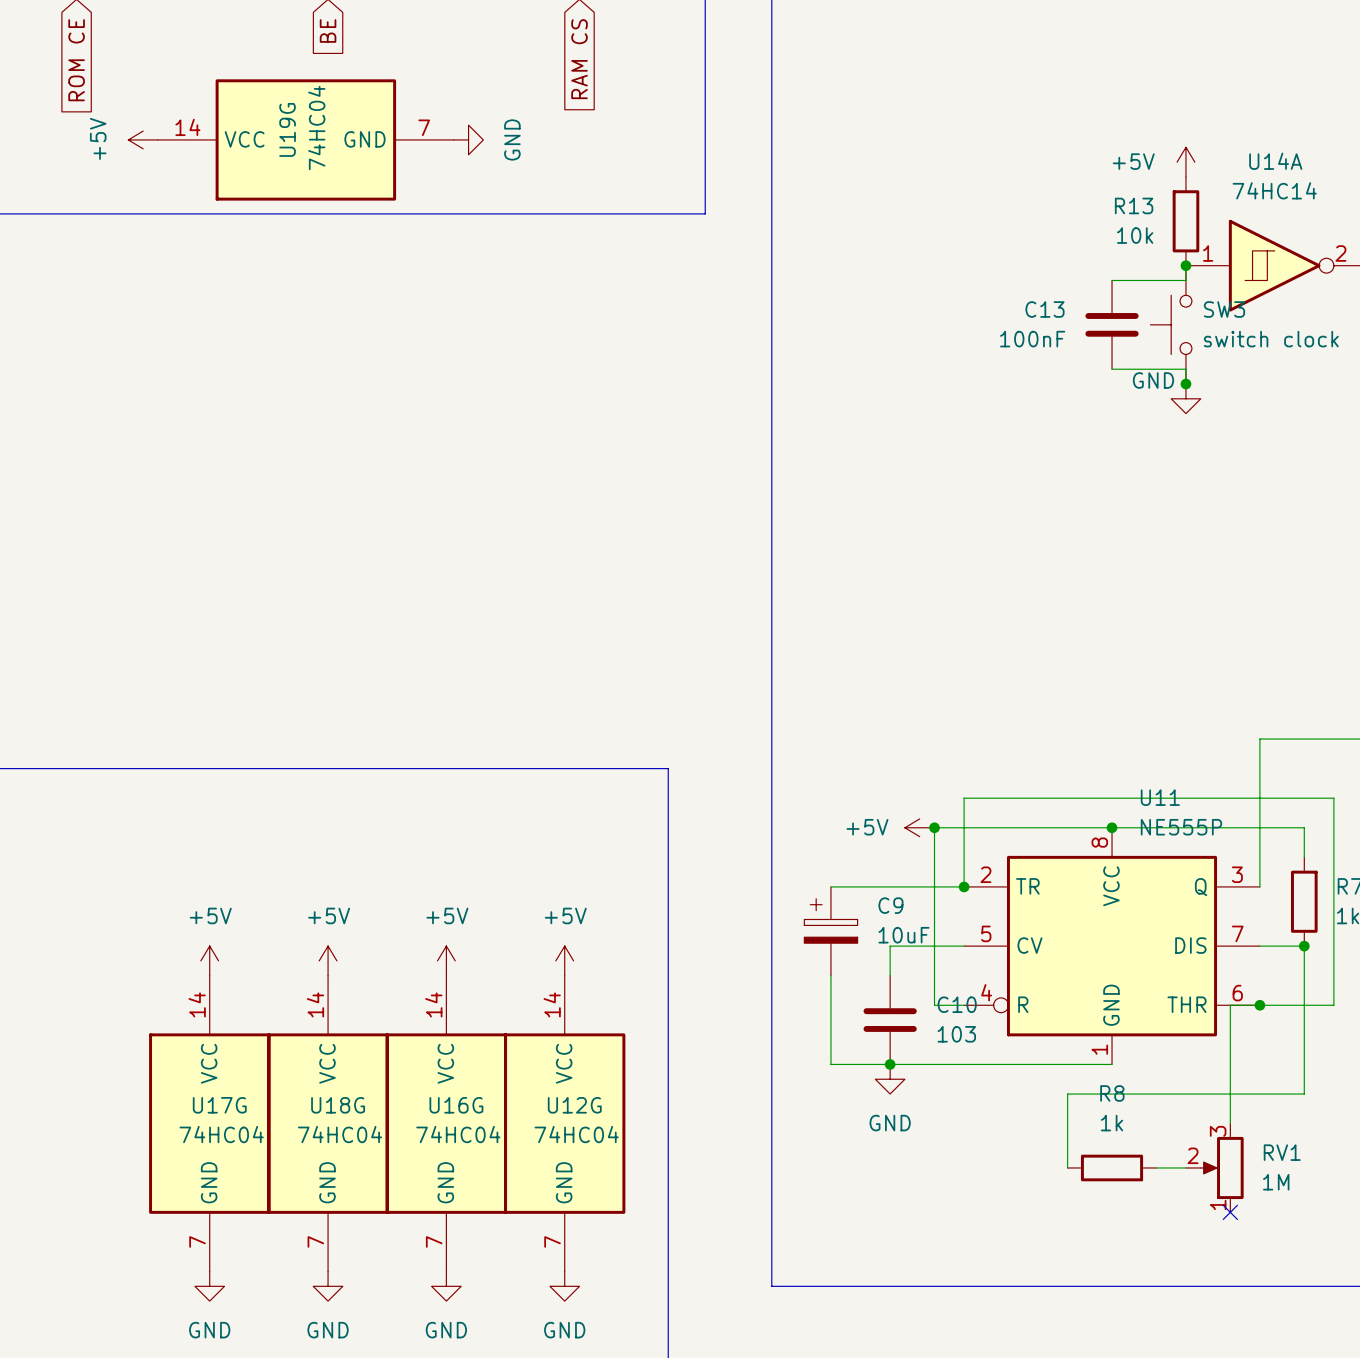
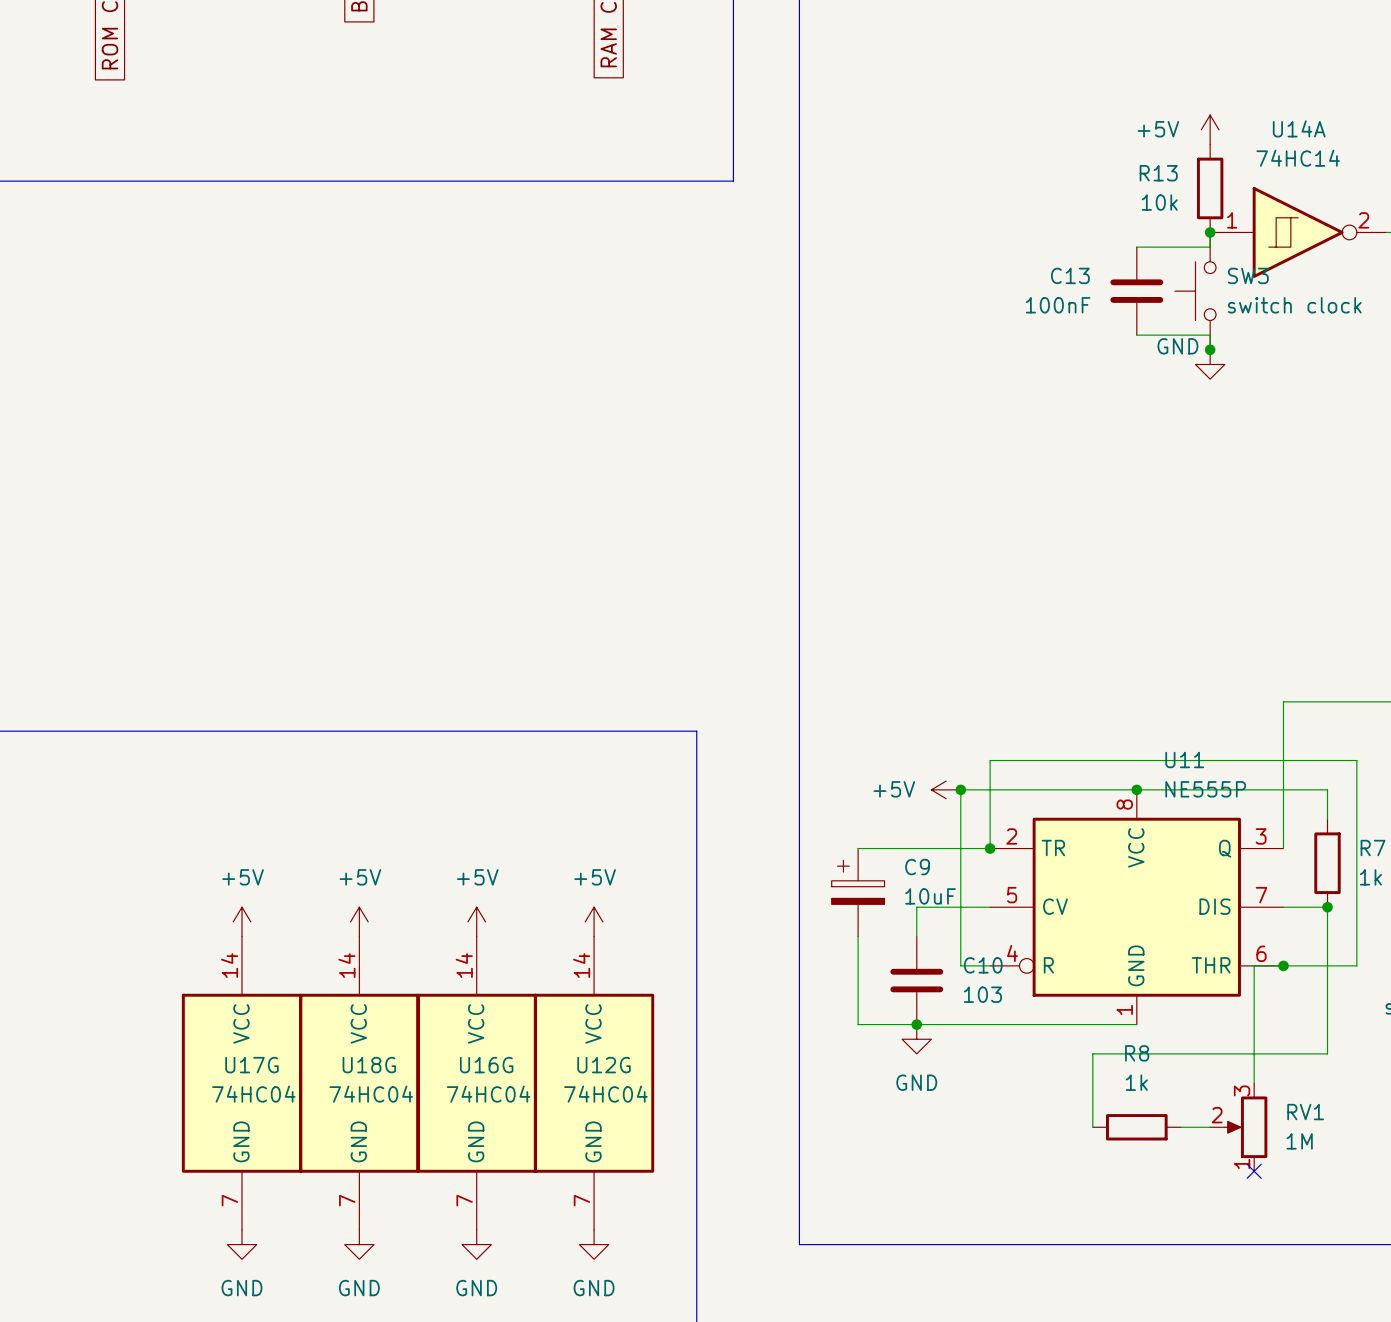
power symbol: +5V (143, 139) -> none
U19G: 74HC04 (305, 139) -> none
power symbol: GND (468, 139) -> none

